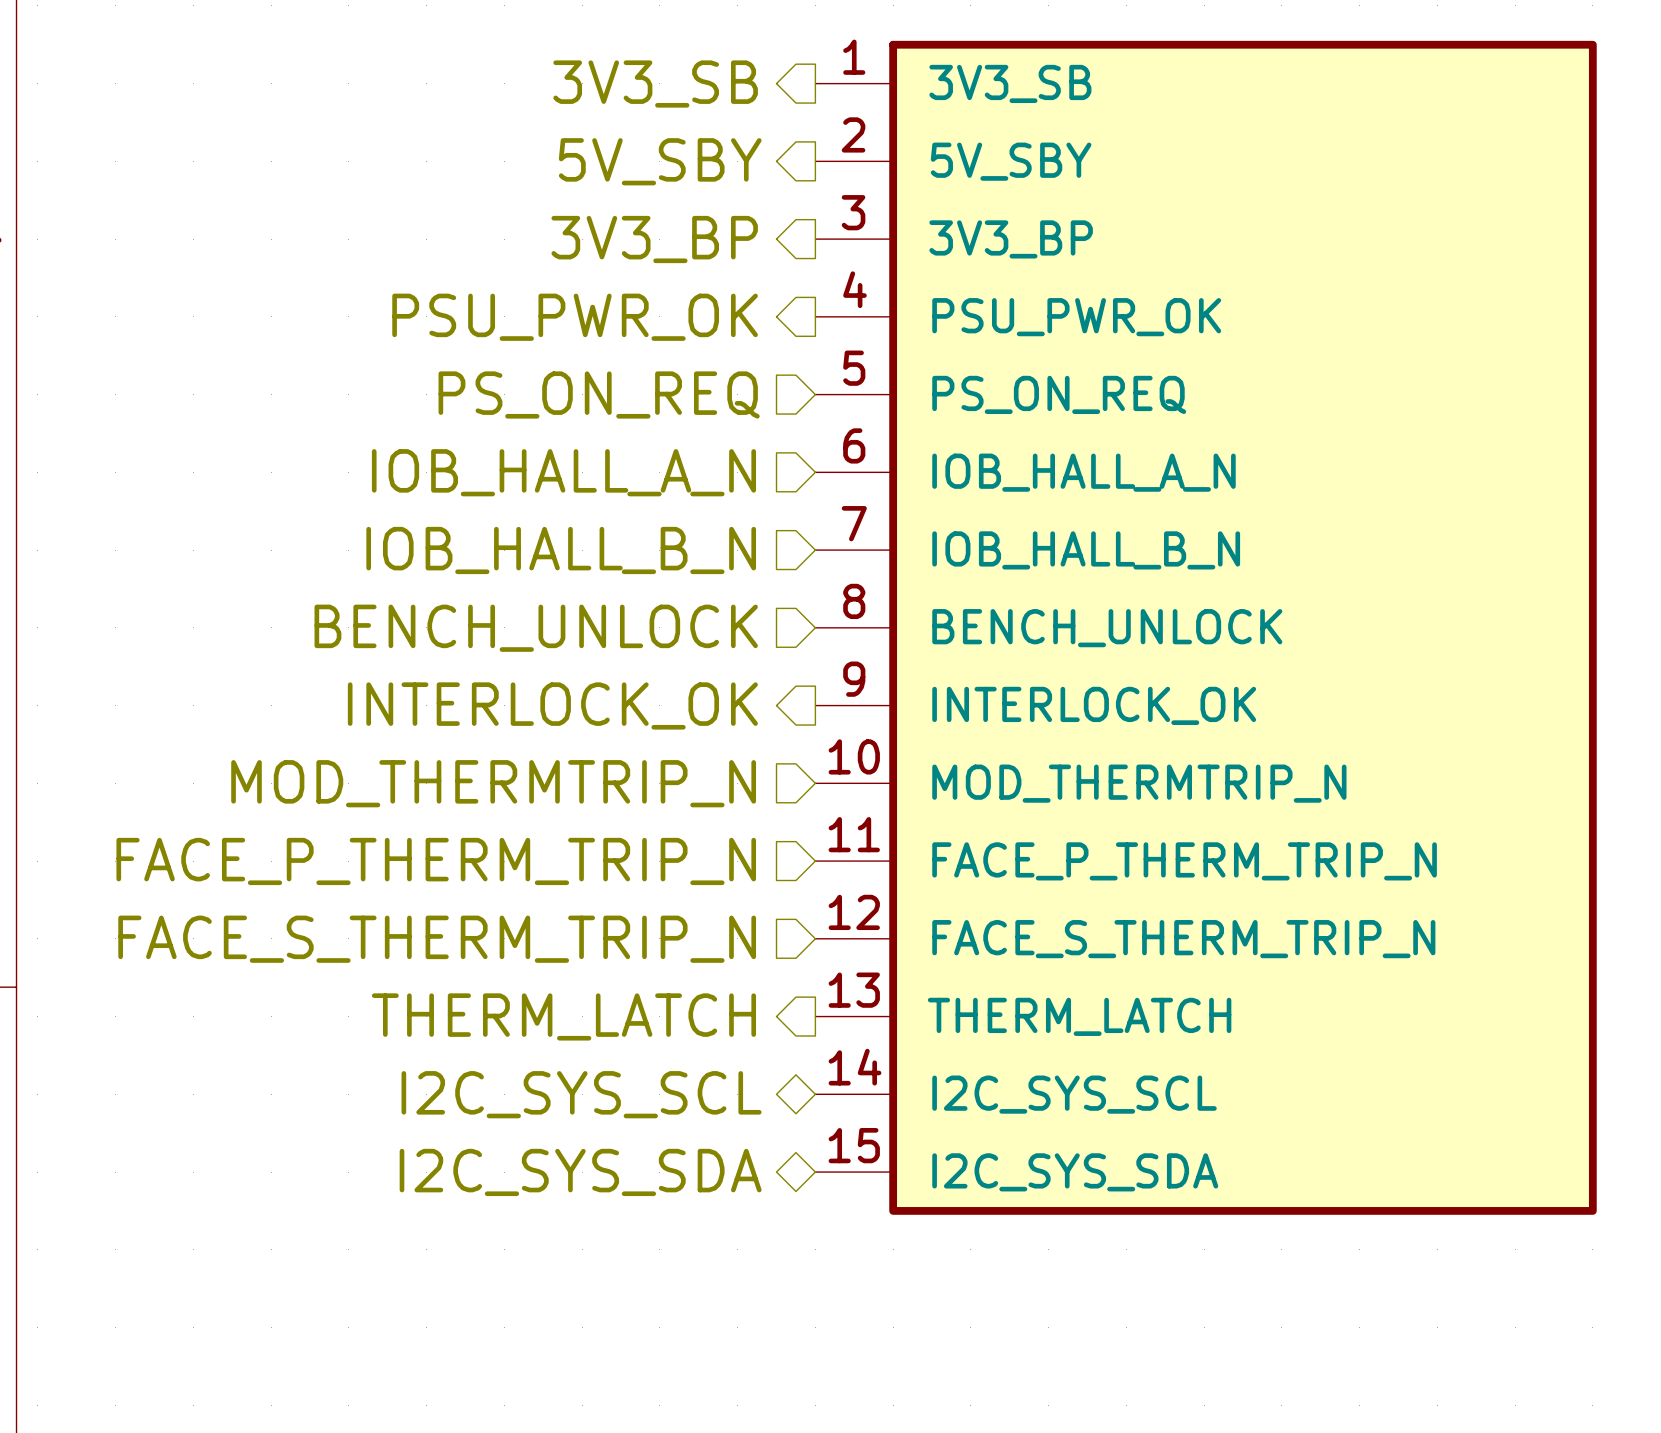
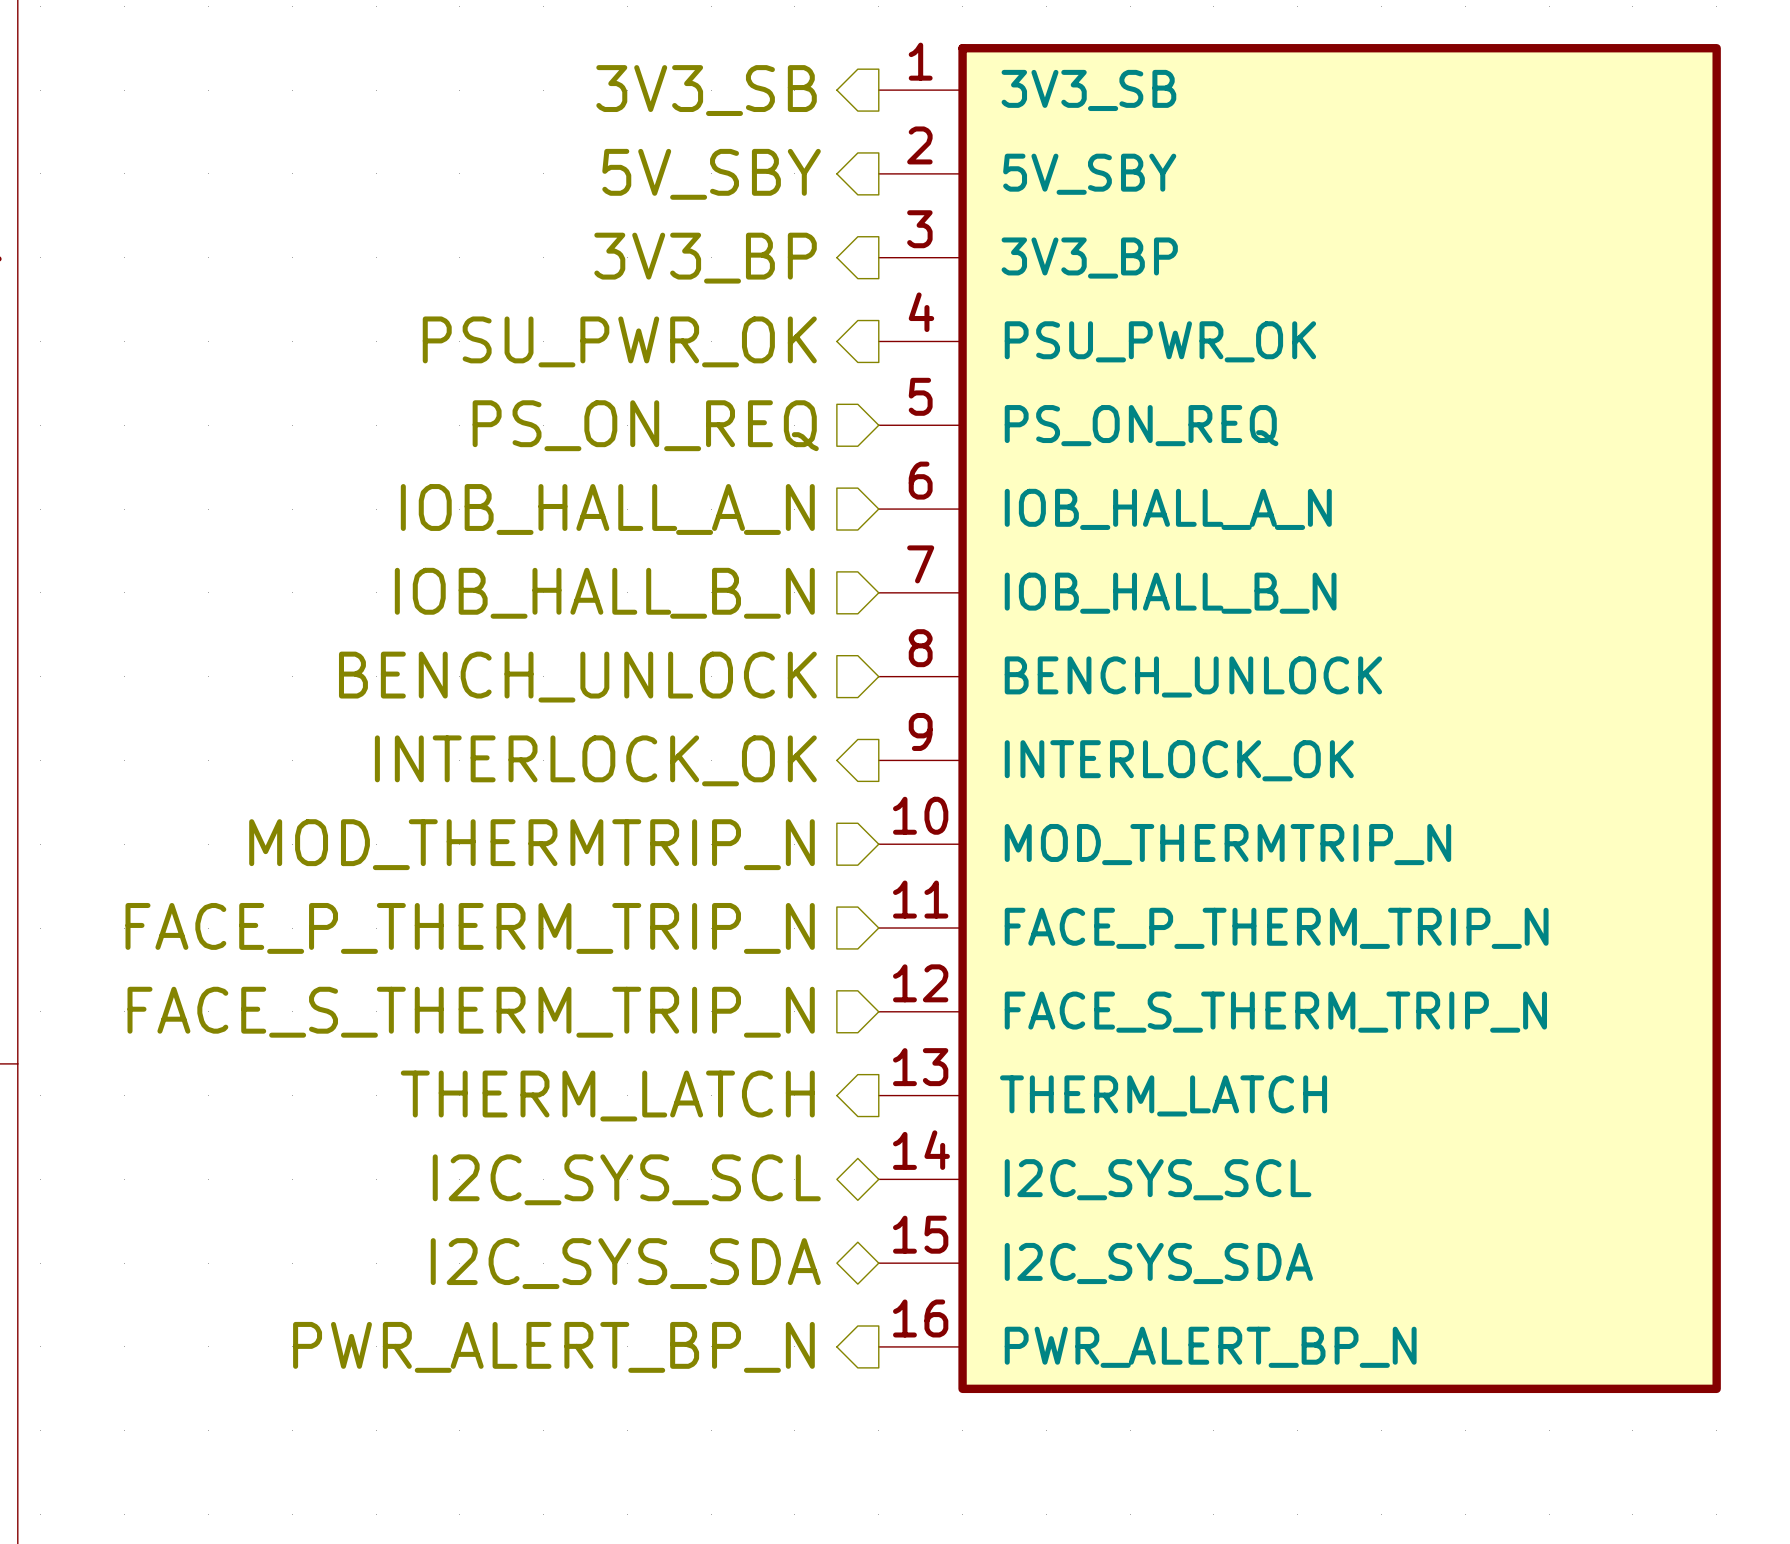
power symbol: (1206, 627) -> none
power symbol: none -> (1299, 718)
hierarchical label: none -> PWR_ALERT_BP_N (553, 1347)

